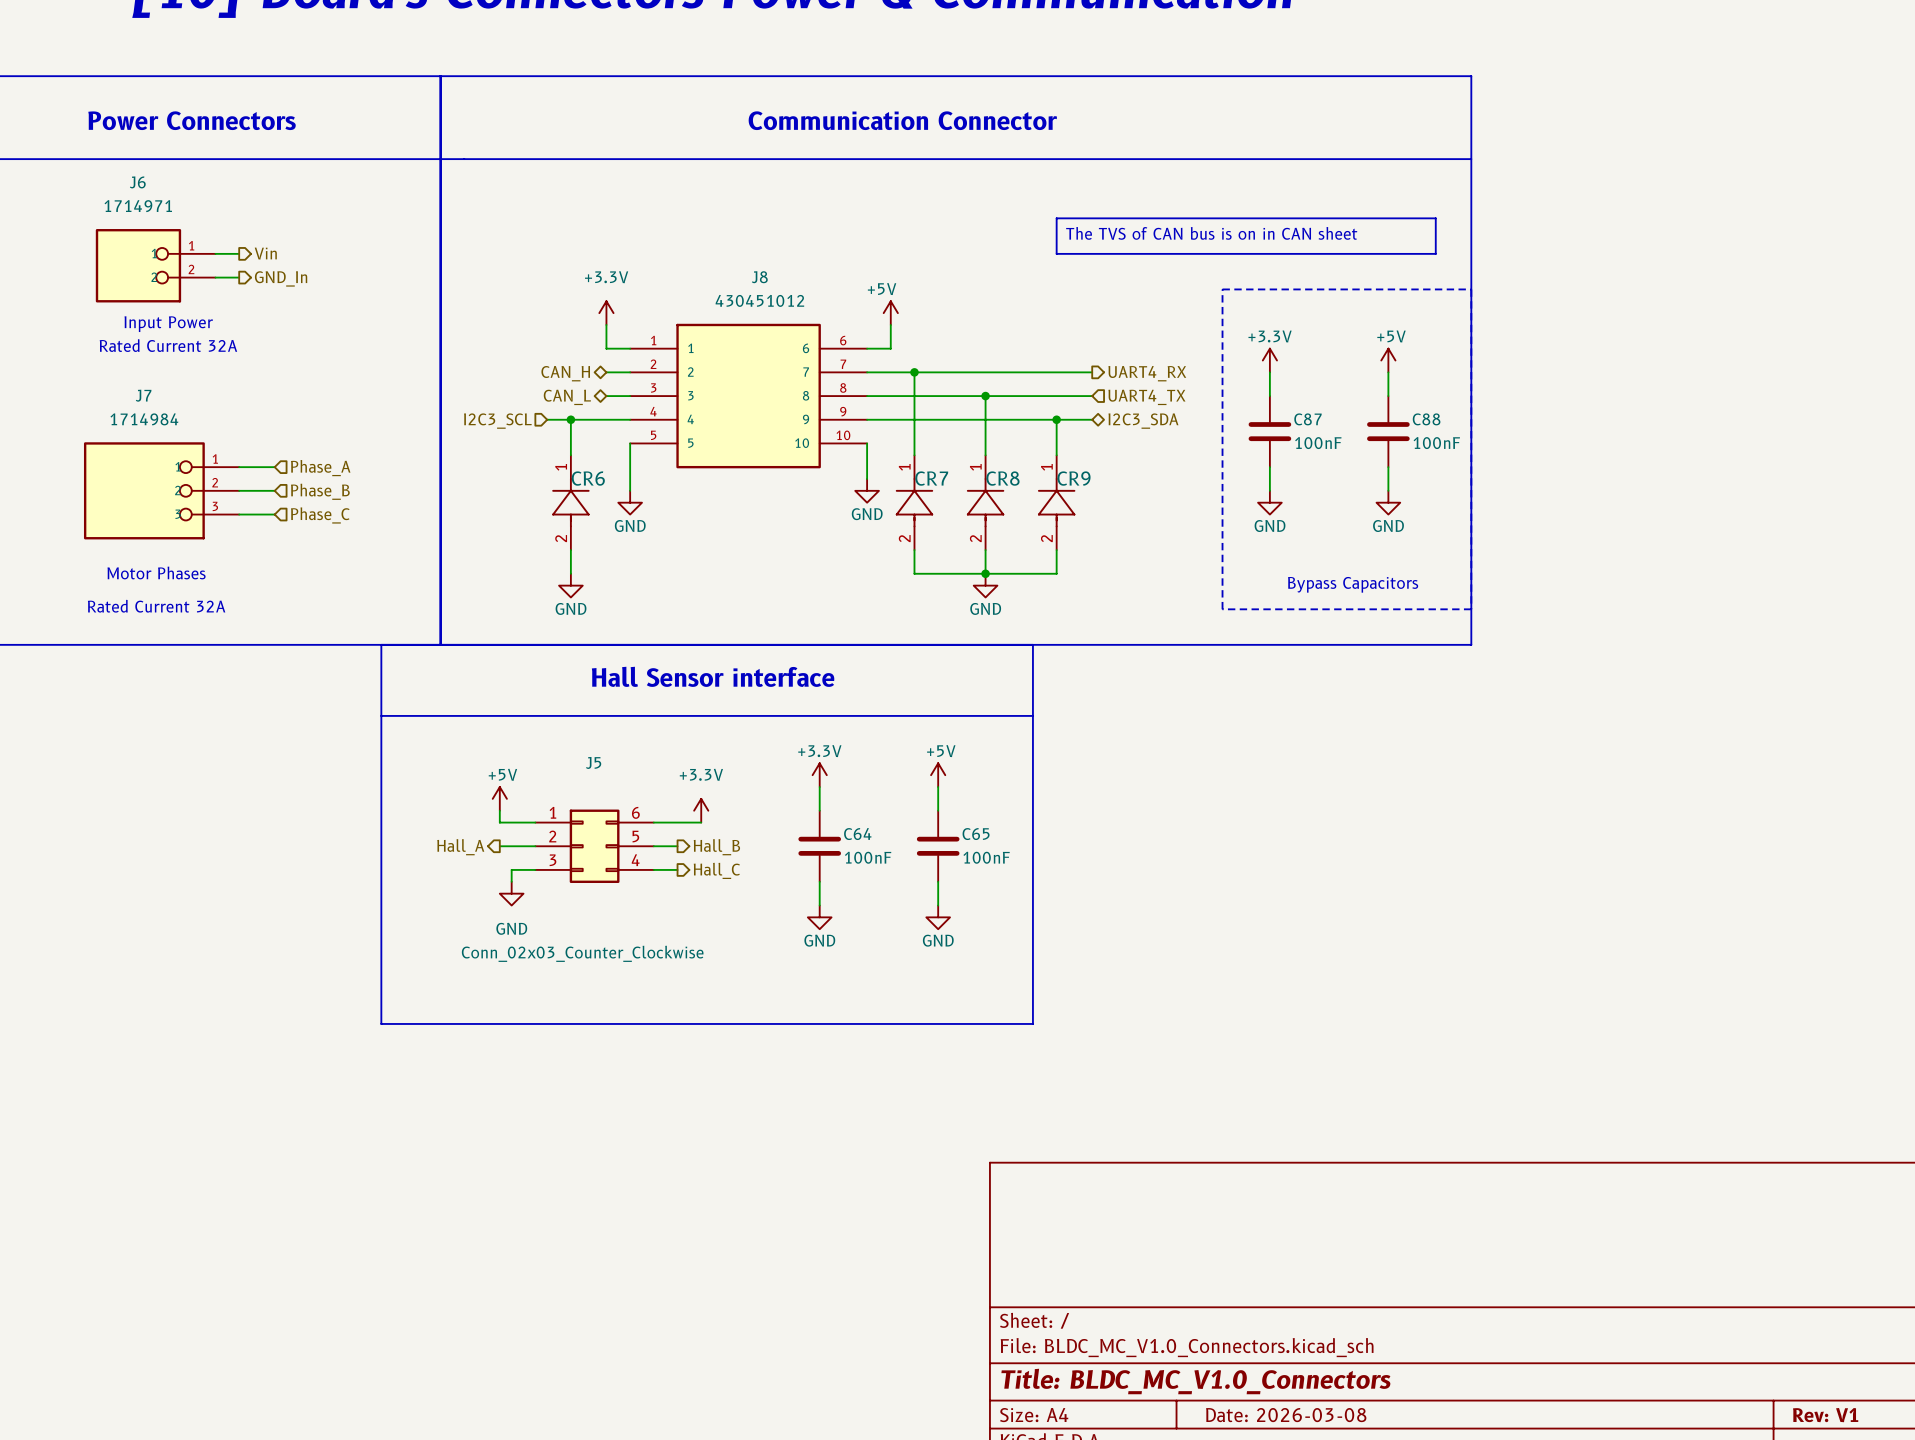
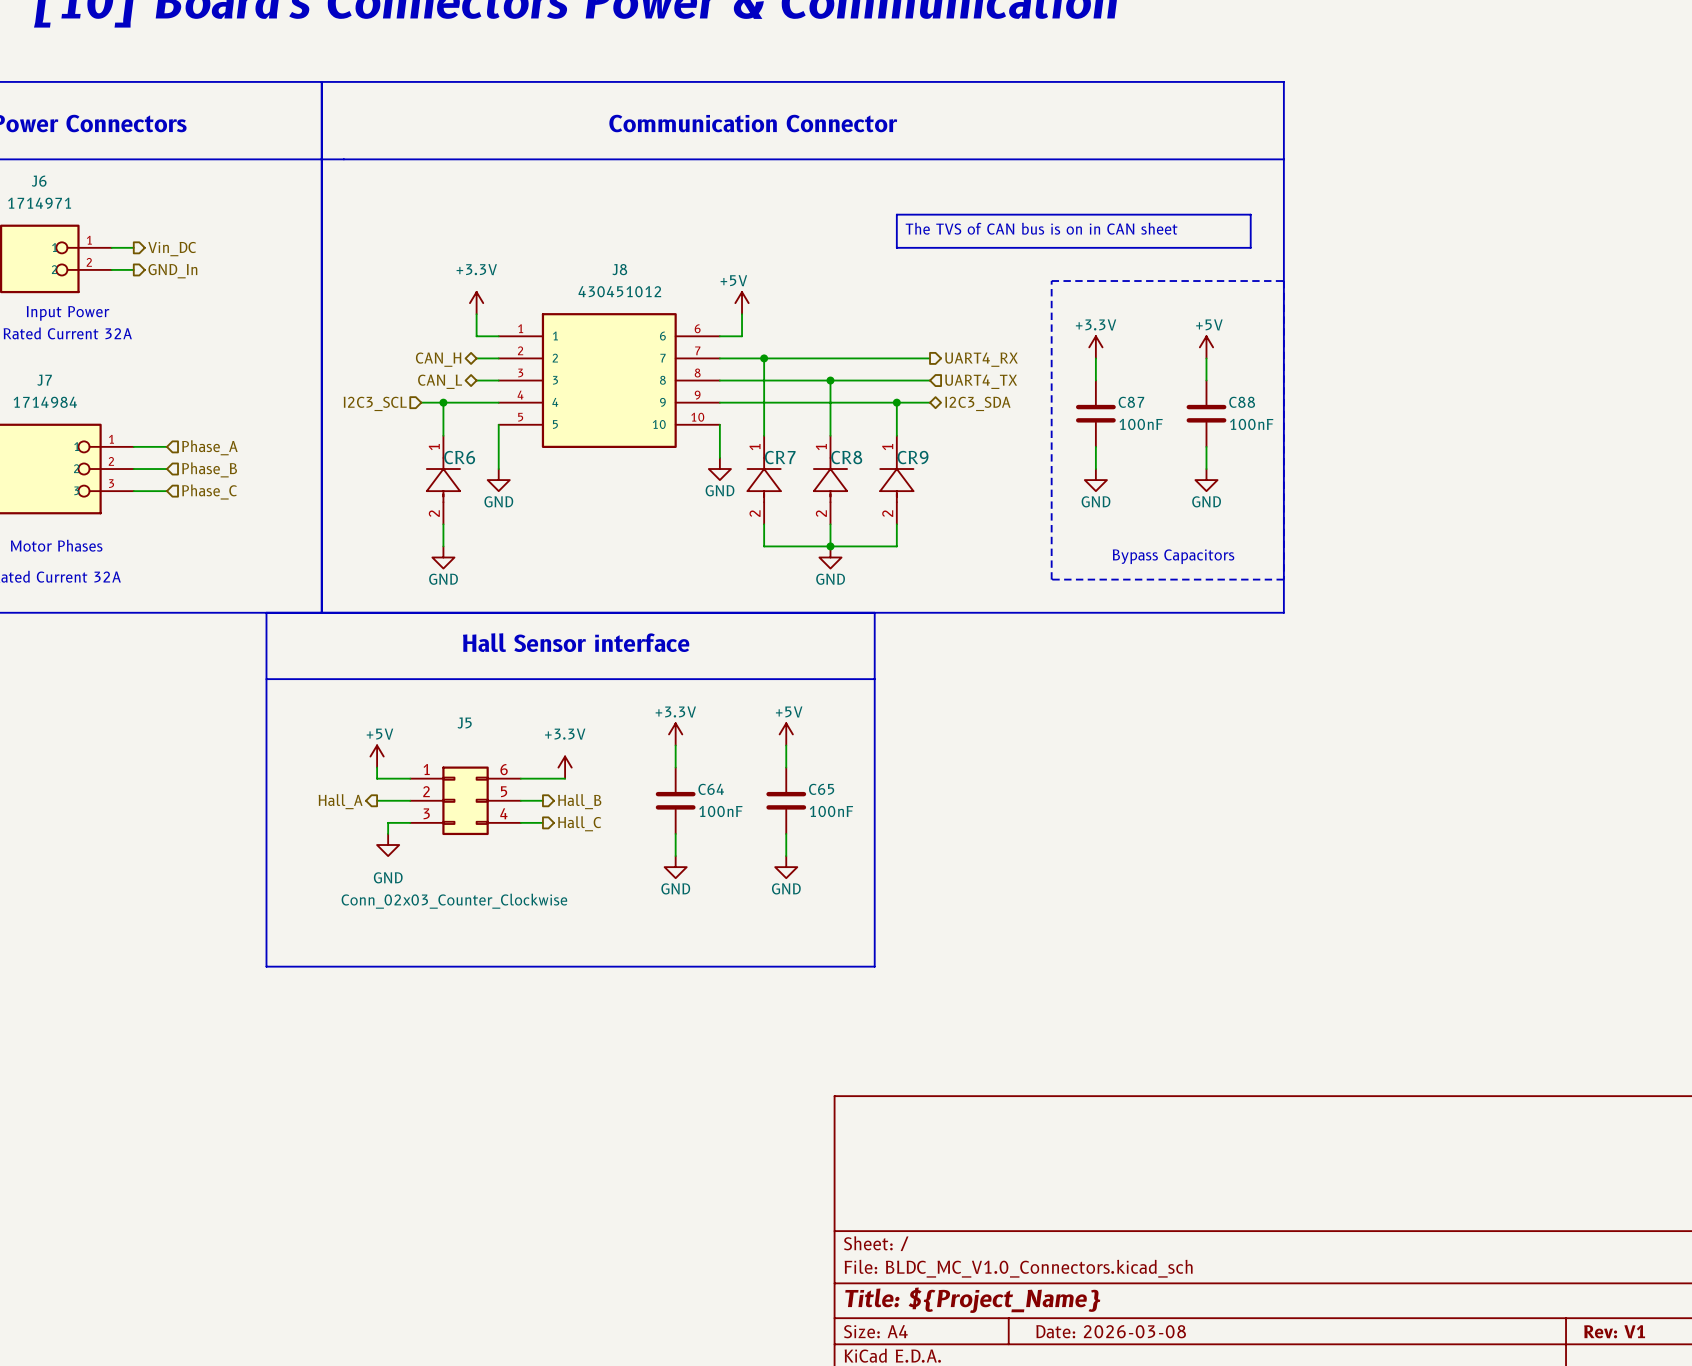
hierarchical label: Vin (265, 253) -> Vin_DC (172, 249)
title block: Title: BLDC_MC_V1.0_Connectors (1195, 1381) -> Title: ${Project_Name} (972, 1300)

